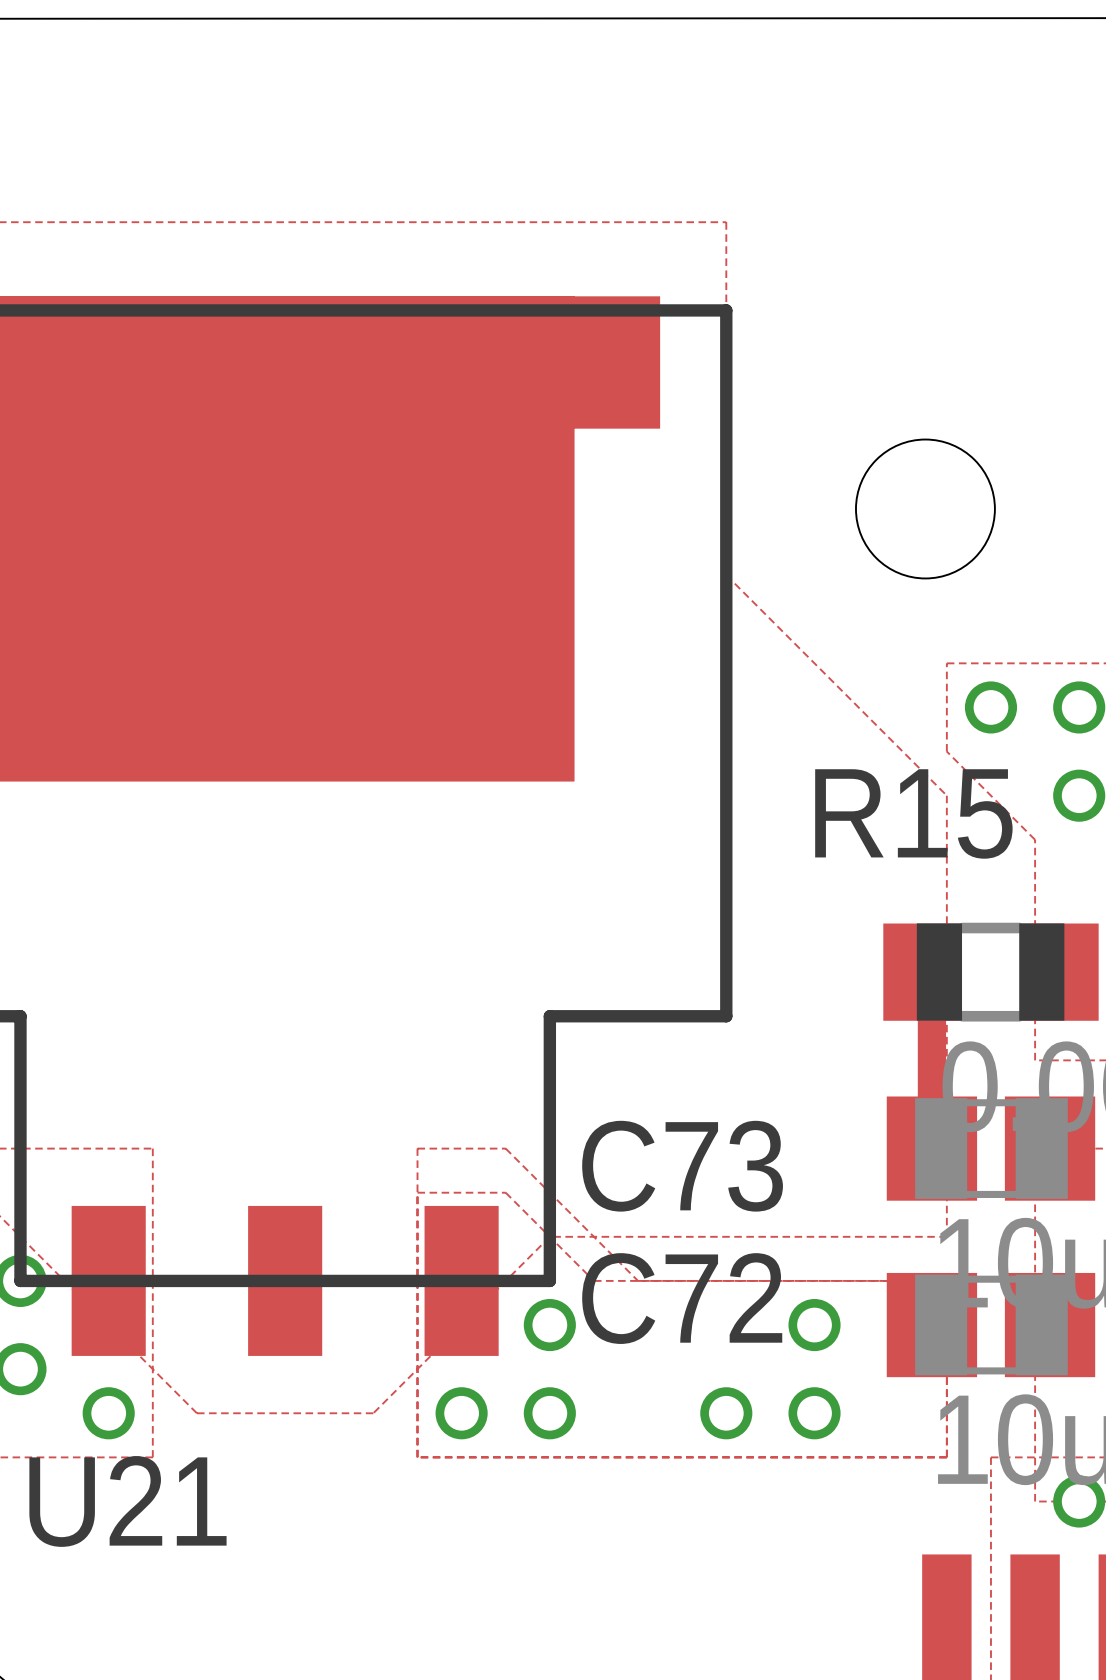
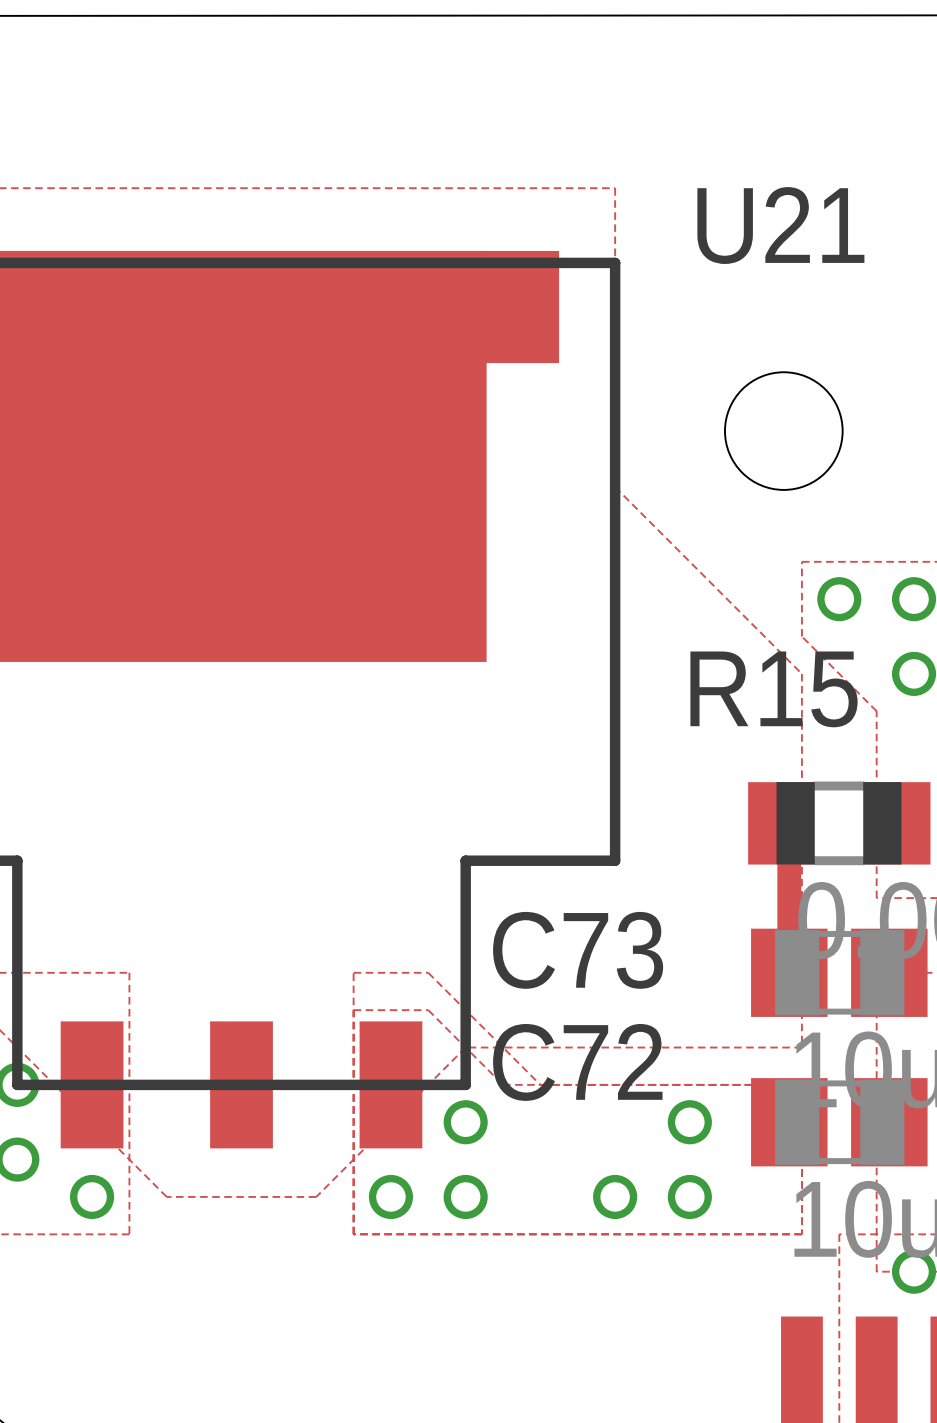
C73 name position: C73 (682, 1166) -> C73 (578, 950)
C72 name position: C72 (682, 1298) -> C72 (577, 1062)
U21 name position: U21 (127, 1501) -> U21 (780, 225)

